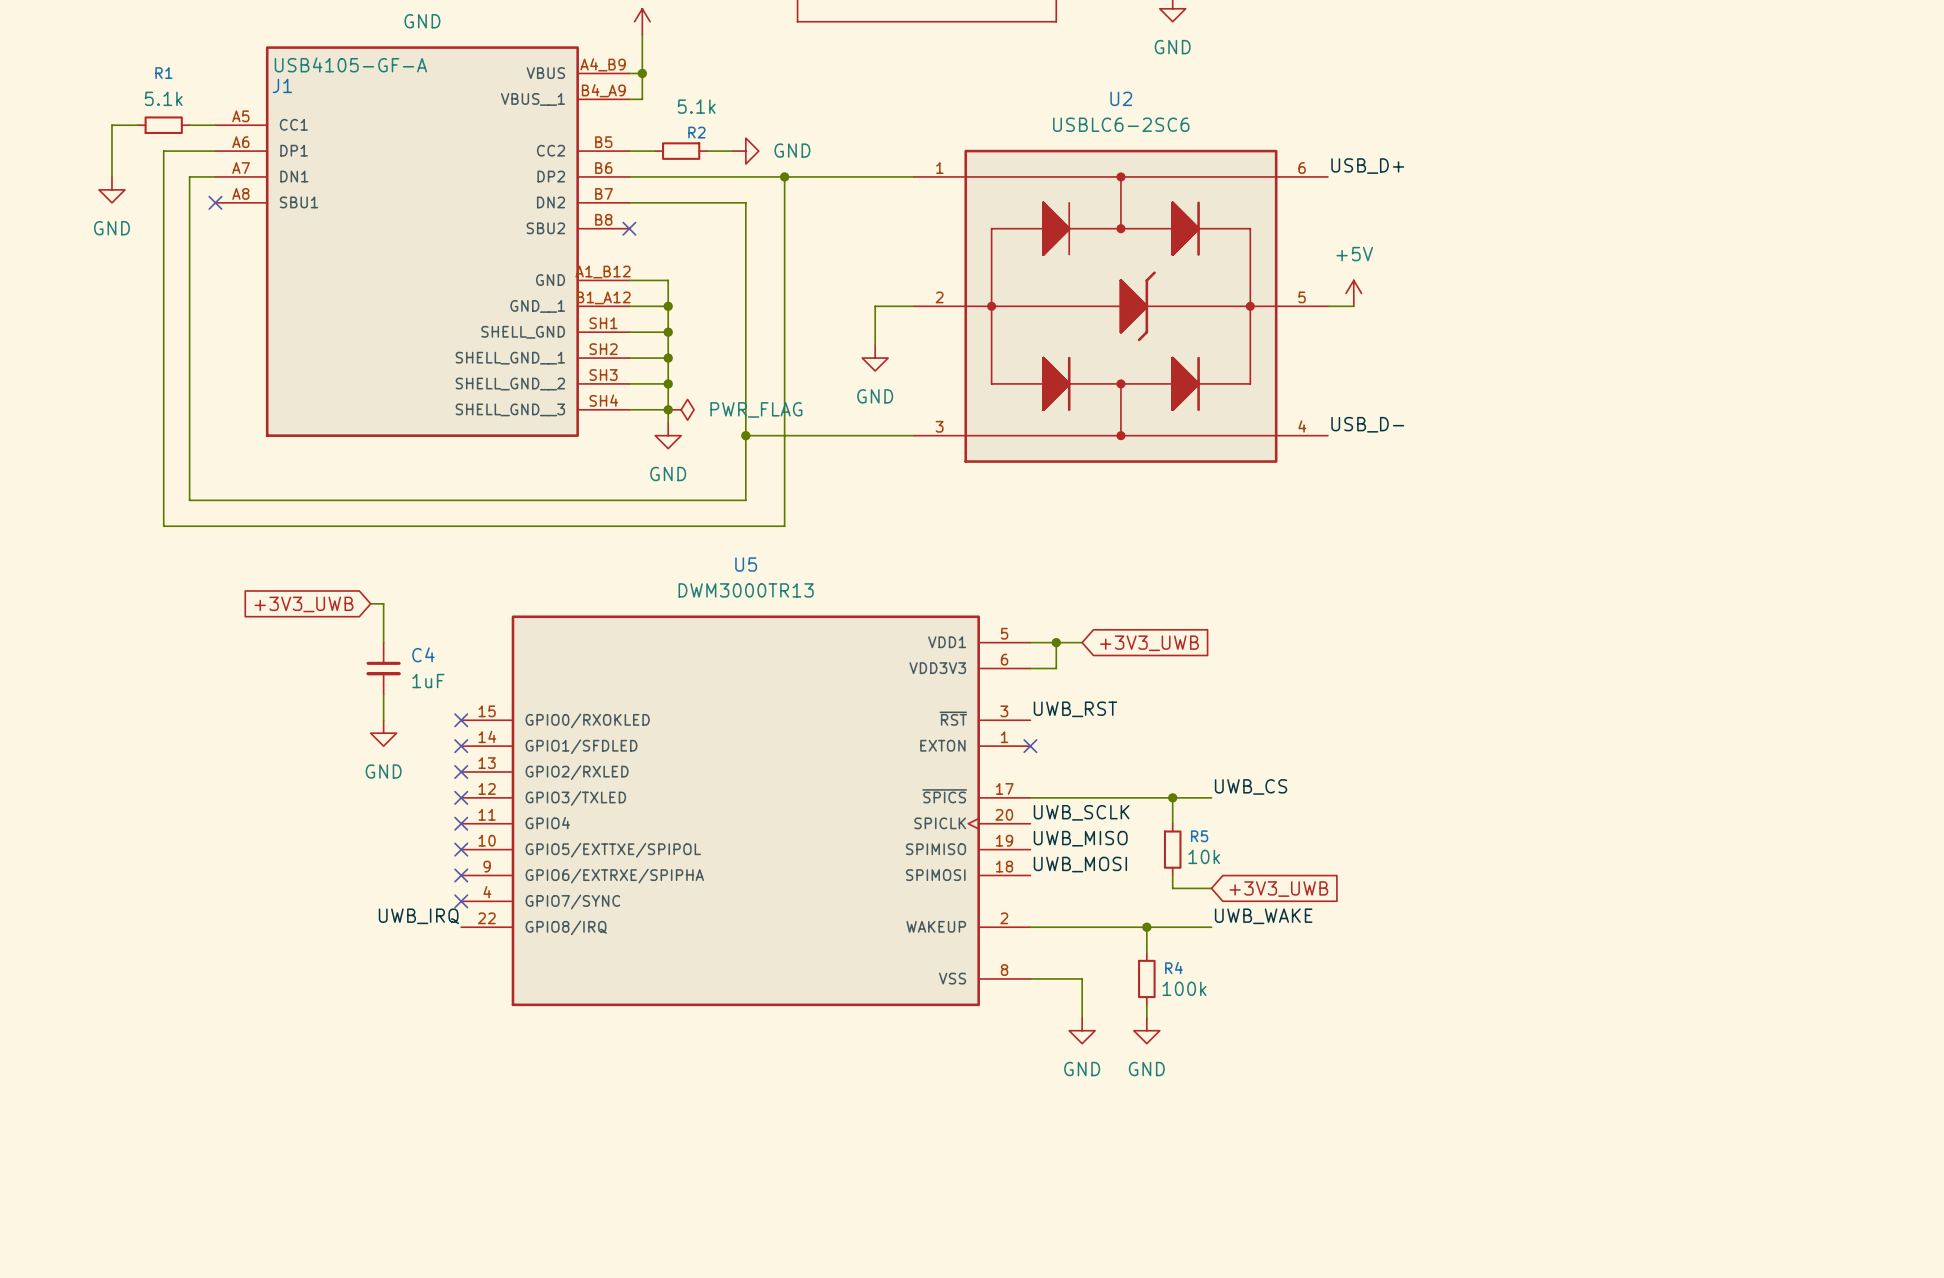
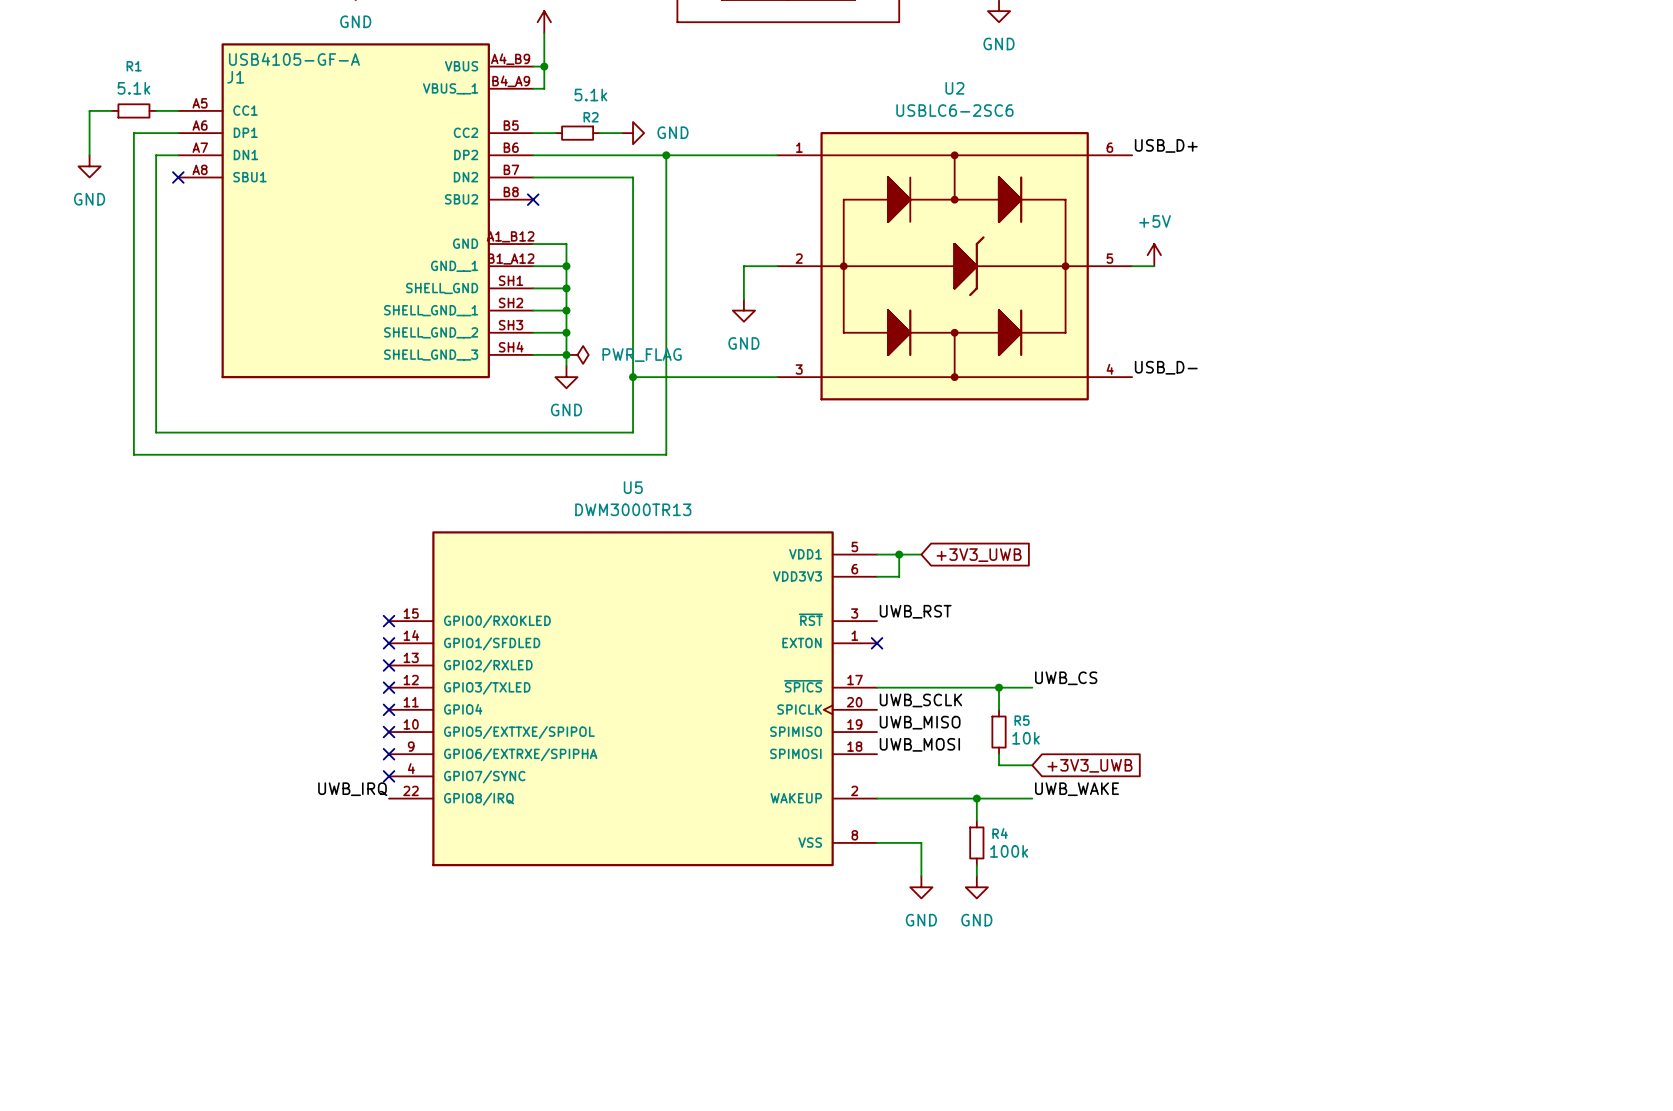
wire: (370, 603) (383, 603) (383, 642) -> none
global label: +3V3_UWB (303, 604) -> none
C4: 1uF (383, 668) -> none
wire: (383, 694) (383, 720) -> none
power symbol: GND (383, 733) -> none

